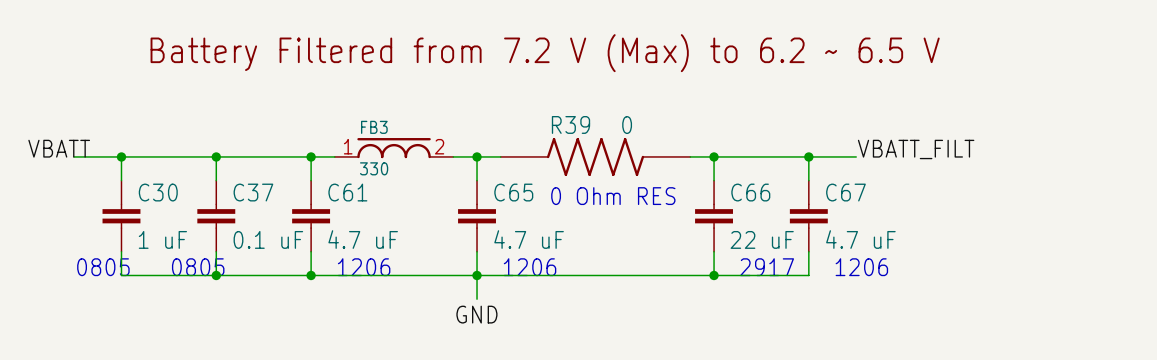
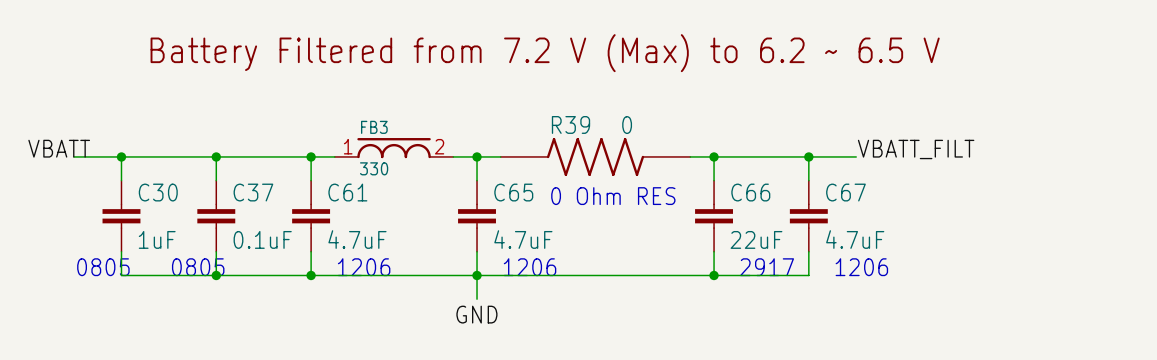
C30 value: 1 uF (162, 239) -> 1uF (157, 239)
C37 value: 0.1 uF (268, 239) -> 0.1uF (262, 239)
C61 value: 4.7 uF (363, 239) -> 4.7uF (357, 239)
C65 value: 4.7 uF (529, 239) -> 4.7uF (523, 239)
C66 value: 22 uF (762, 239) -> 22uF (756, 239)
C67 value: 4.7 uF (860, 239) -> 4.7uF (855, 239)

